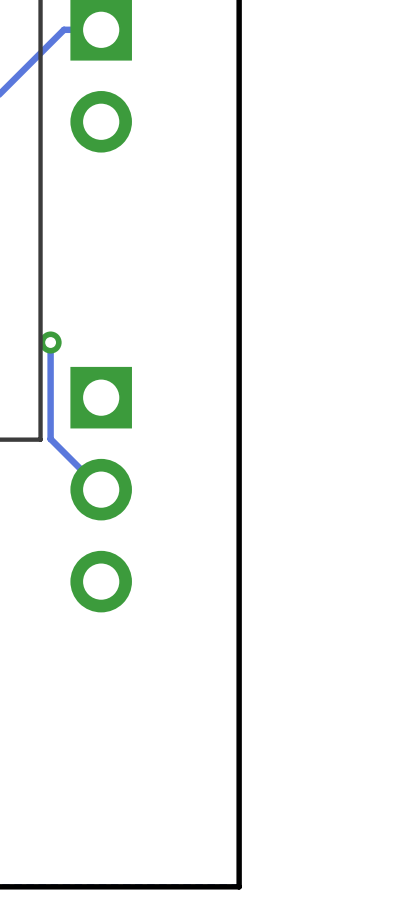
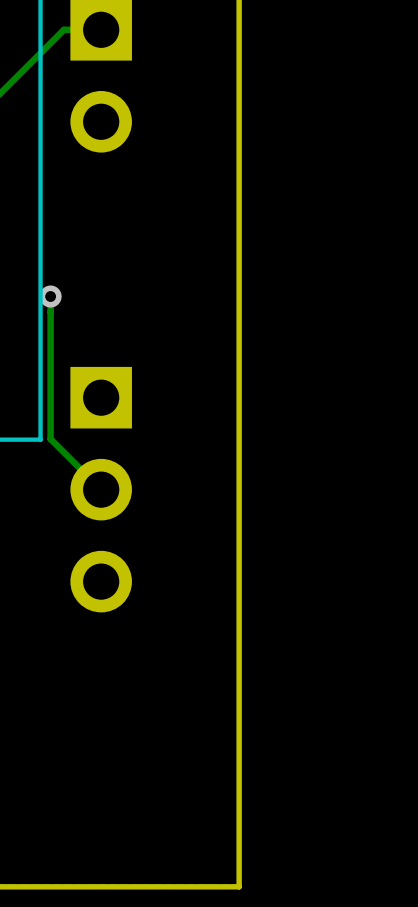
track: none -> (50, 296) (50, 342)
via position: (50, 342) -> (50, 296)

